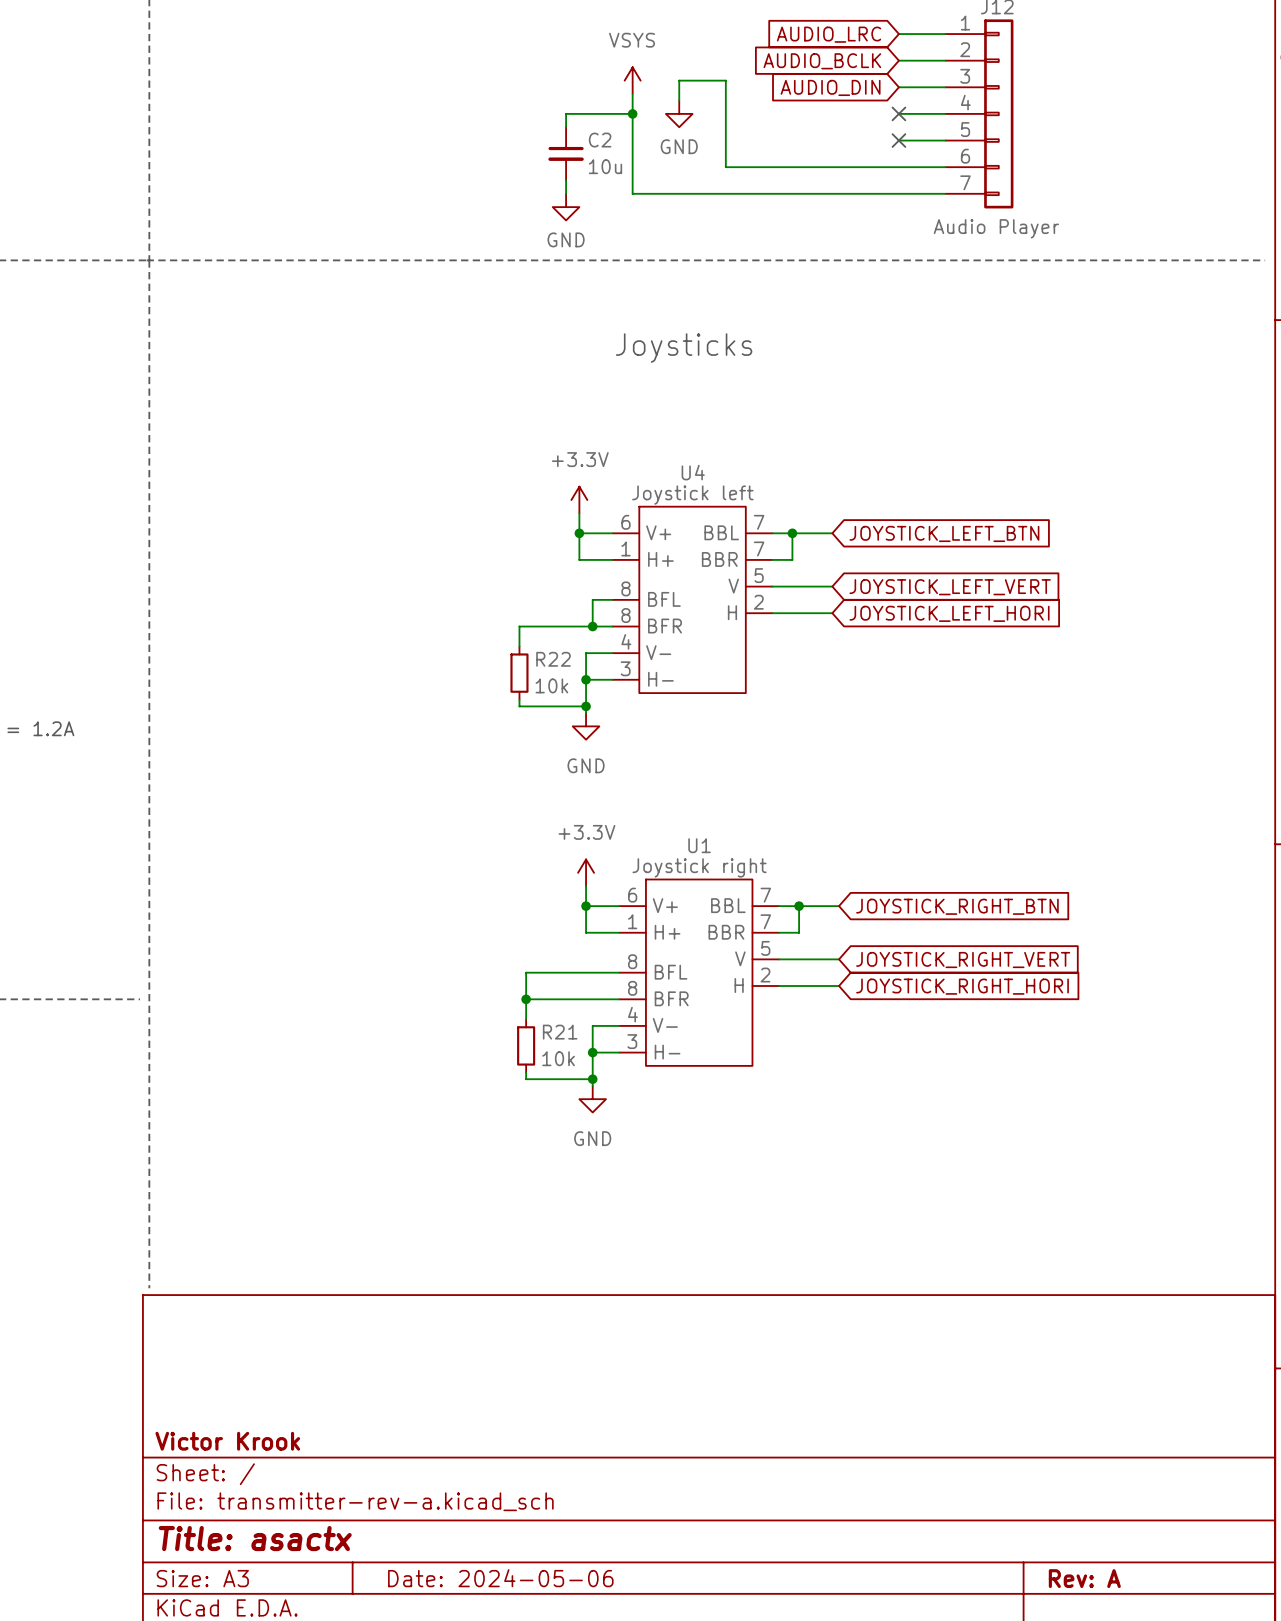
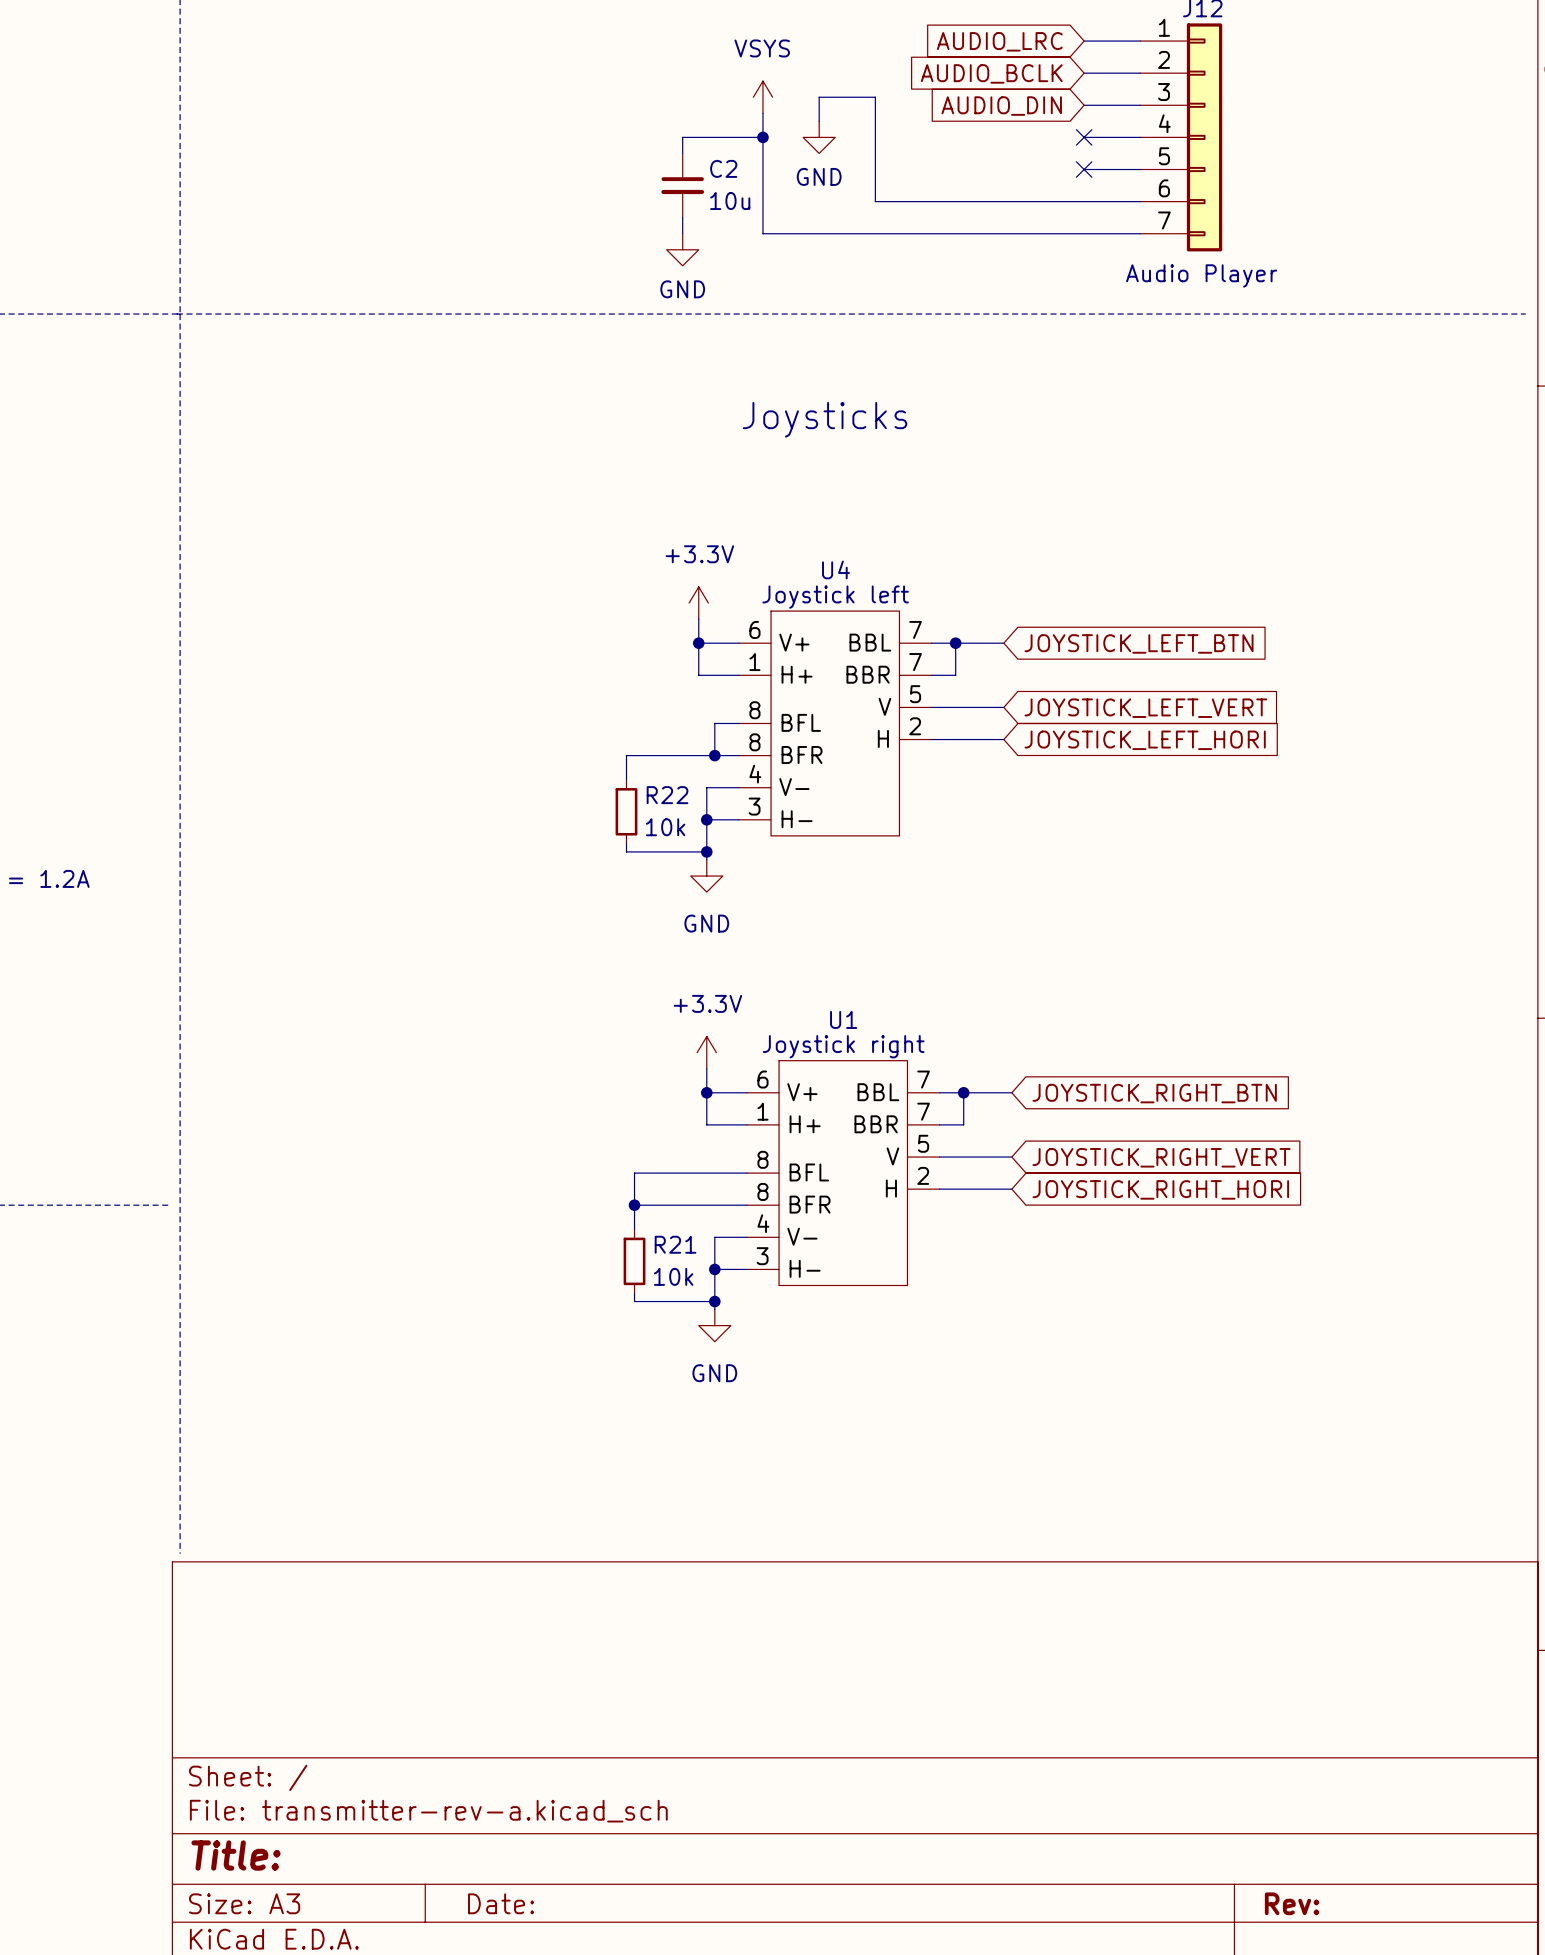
title block: Victor Krook (227, 1441) -> none
title block: Title: asactx (255, 1538) -> Title: (236, 1855)
title block: Date: 2024-05-06 (500, 1578) -> Date: (501, 1903)
title block: Rev: A (1084, 1578) -> Rev: (1292, 1903)

